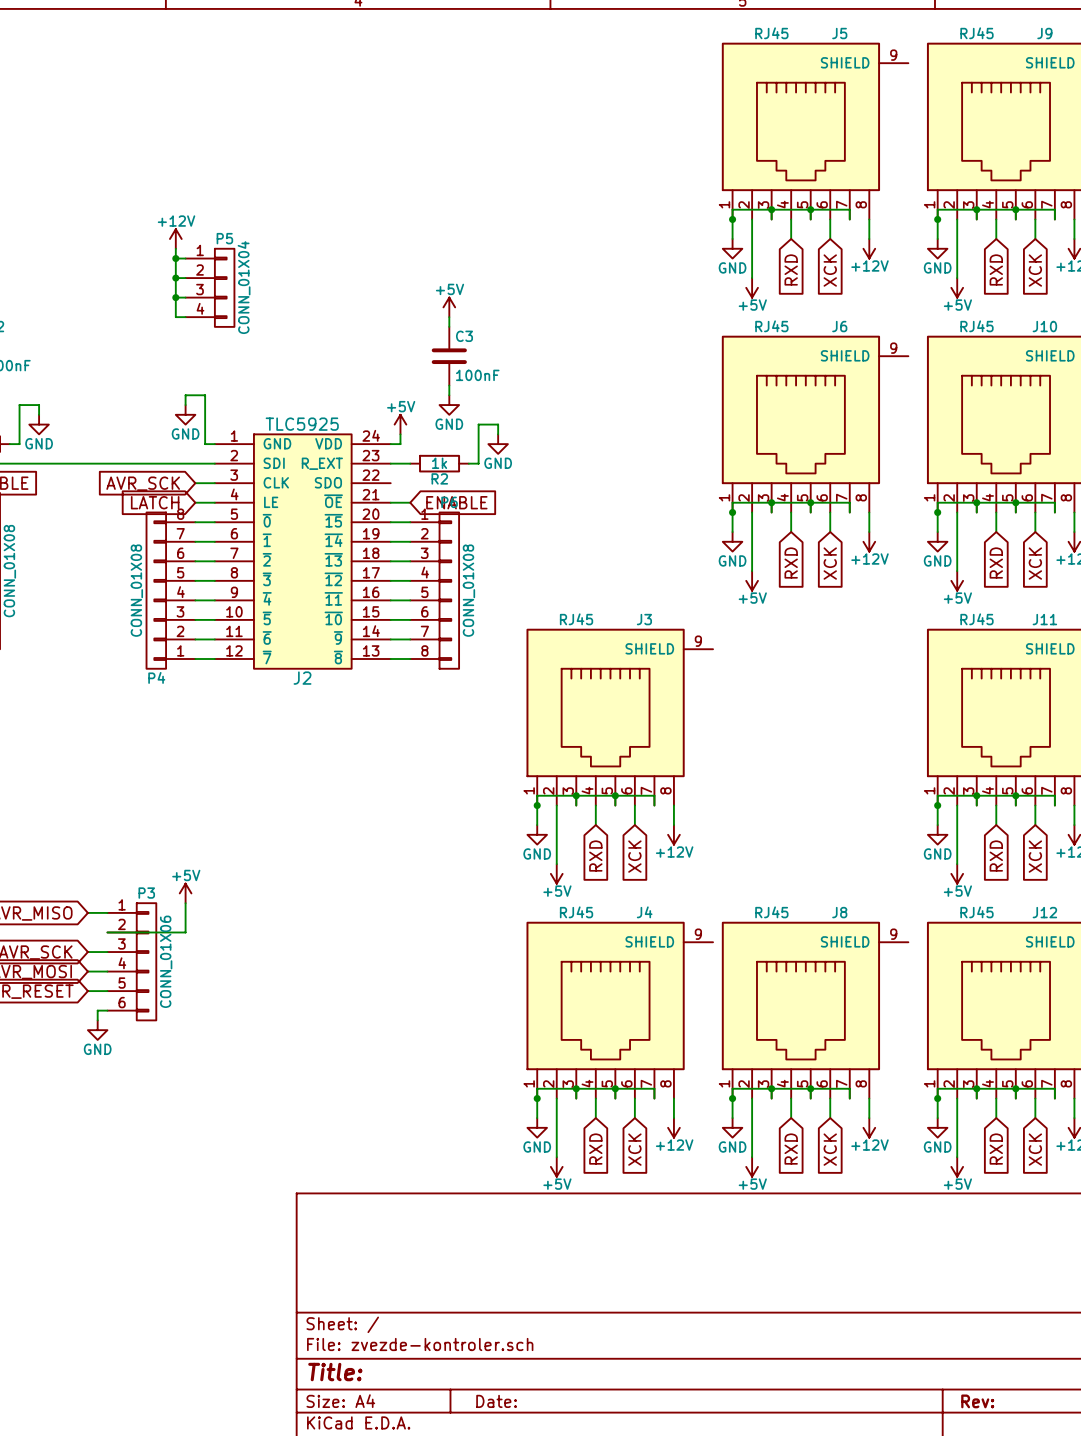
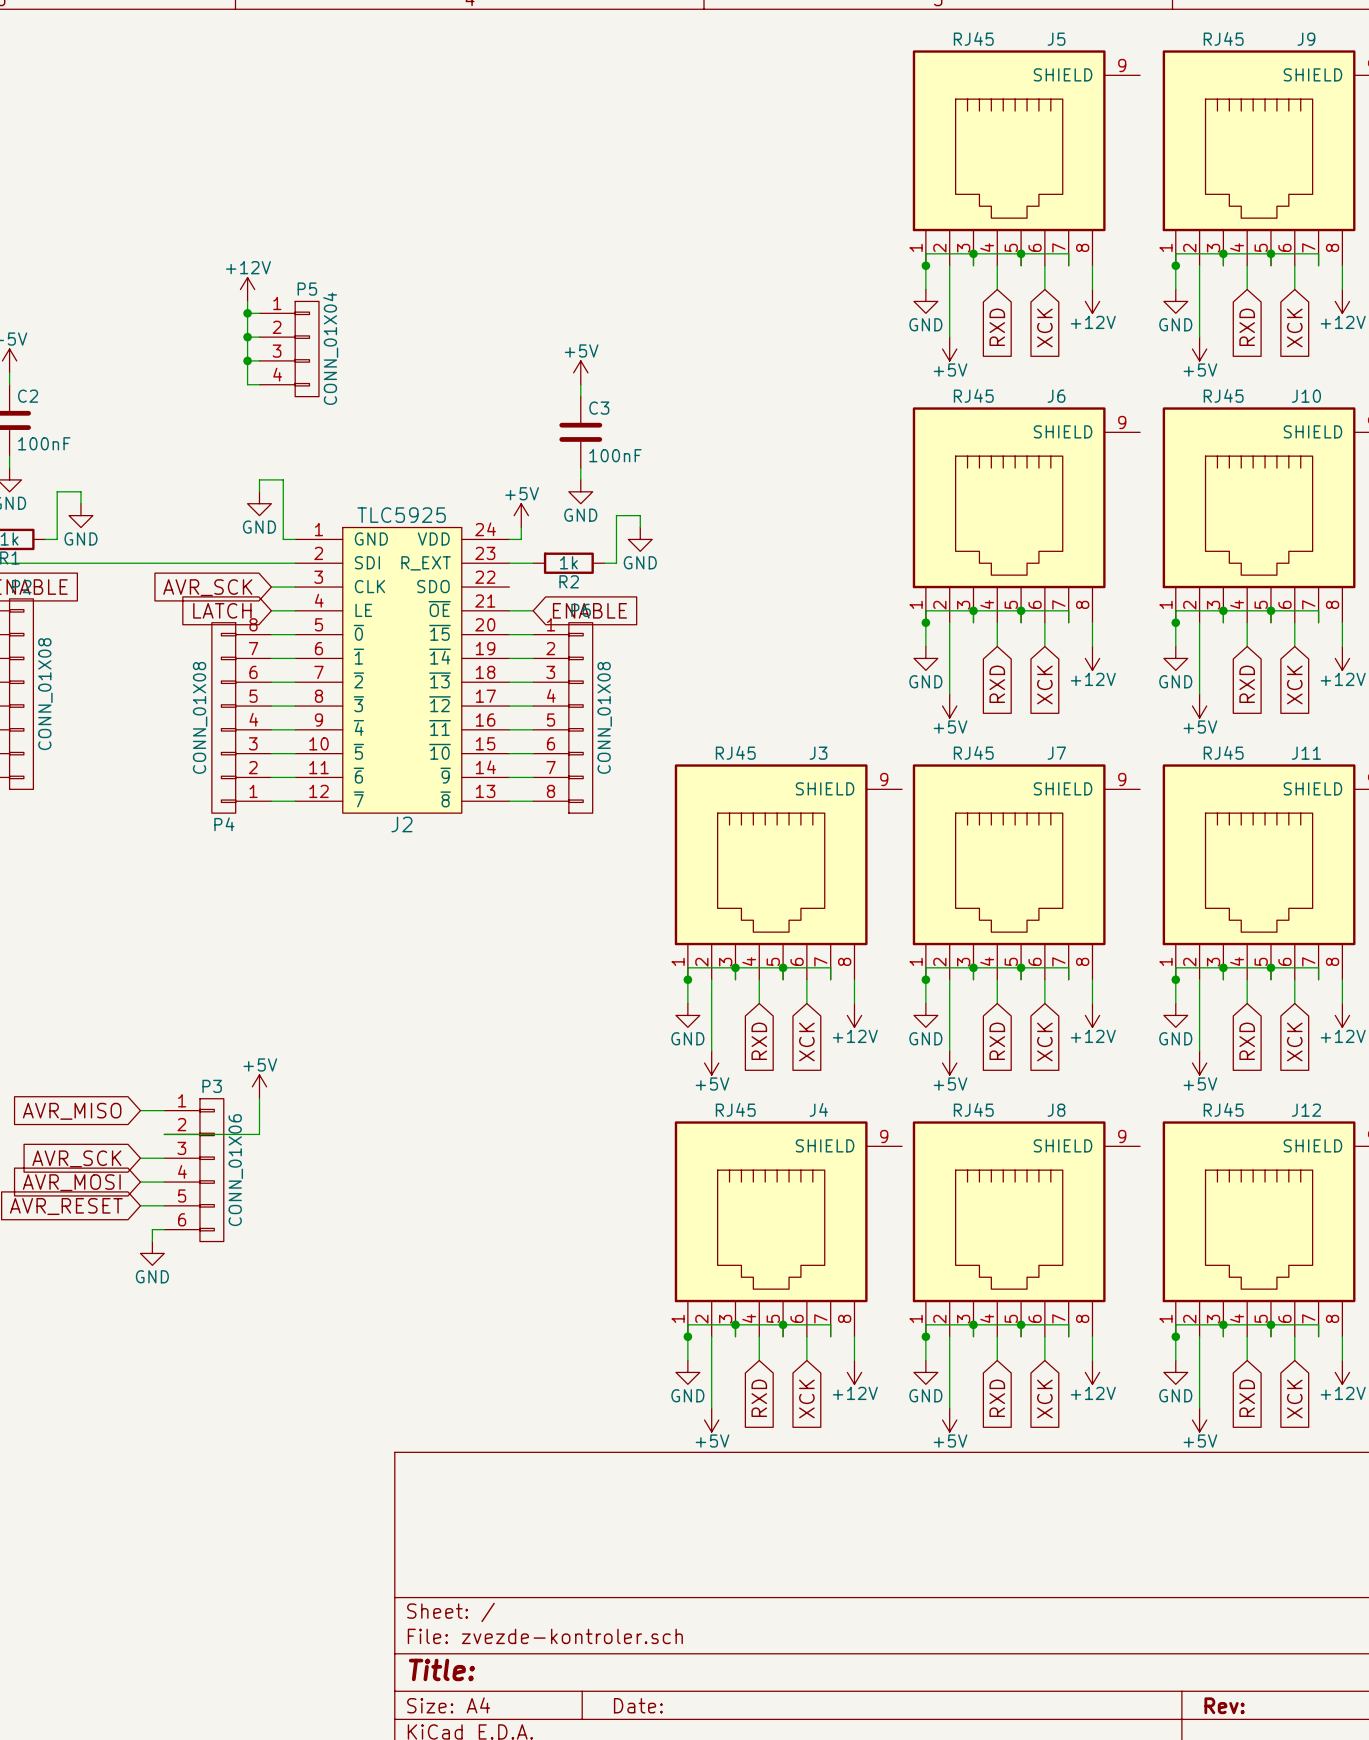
J7: none -> RJ45 (1026, 872)
wire: none -> (973, 967) (973, 979)
junction: none -> (973, 967)
wire: none -> (1021, 967) (1021, 979)
junction: none -> (1021, 967)
junction: none -> (925, 979)
wire: none -> (949, 979) (949, 1051)
wire: none -> (997, 979) (997, 1003)
wire: none -> (1044, 979) (1044, 1003)
wire: none -> (1068, 979) (1068, 967) (925, 967) (925, 1003)
wire: none -> (1092, 979) (1092, 1003)
power symbol: none -> GND (925, 1015)
power symbol: none -> +12V (1092, 1015)
global label: none -> RXD (997, 1041)
global label: none -> XCK (1044, 1041)
power symbol: none -> +5V (949, 1063)

